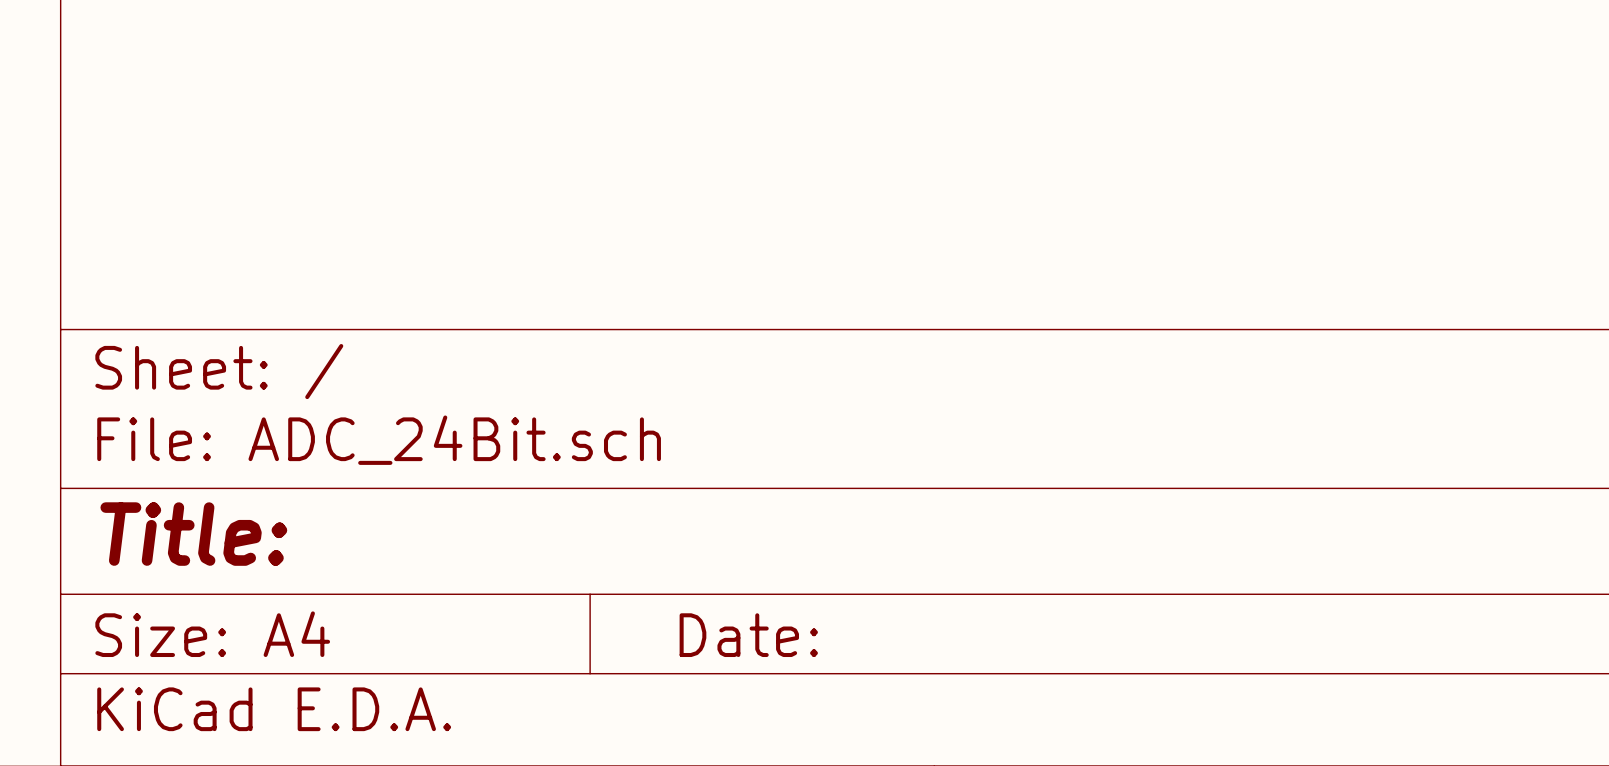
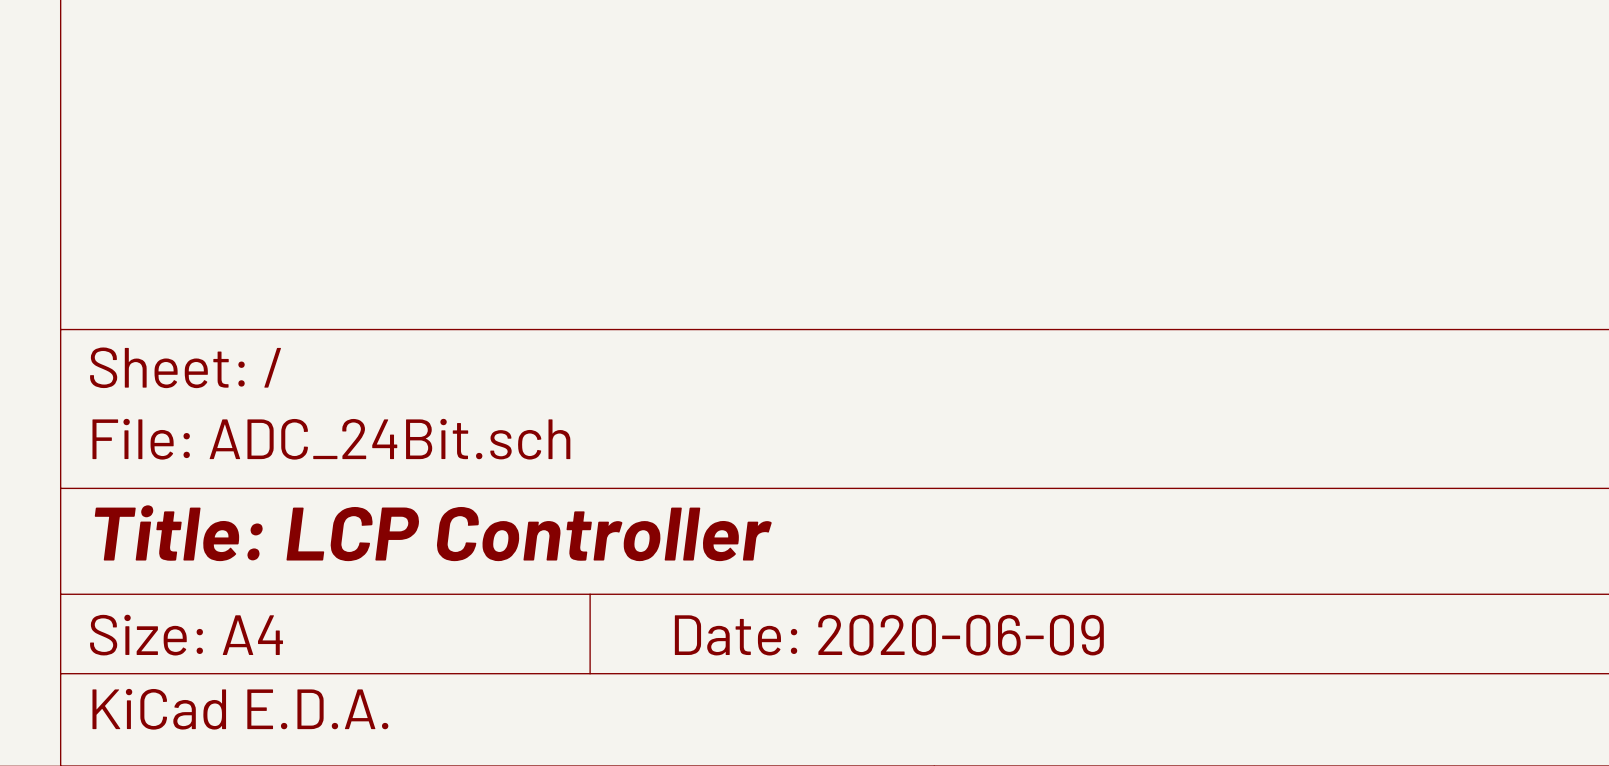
title block: Title: (193, 534) -> Title: LCP Controller (433, 533)
title block: Date: (748, 635) -> Date: 2020-06-09 (889, 635)

